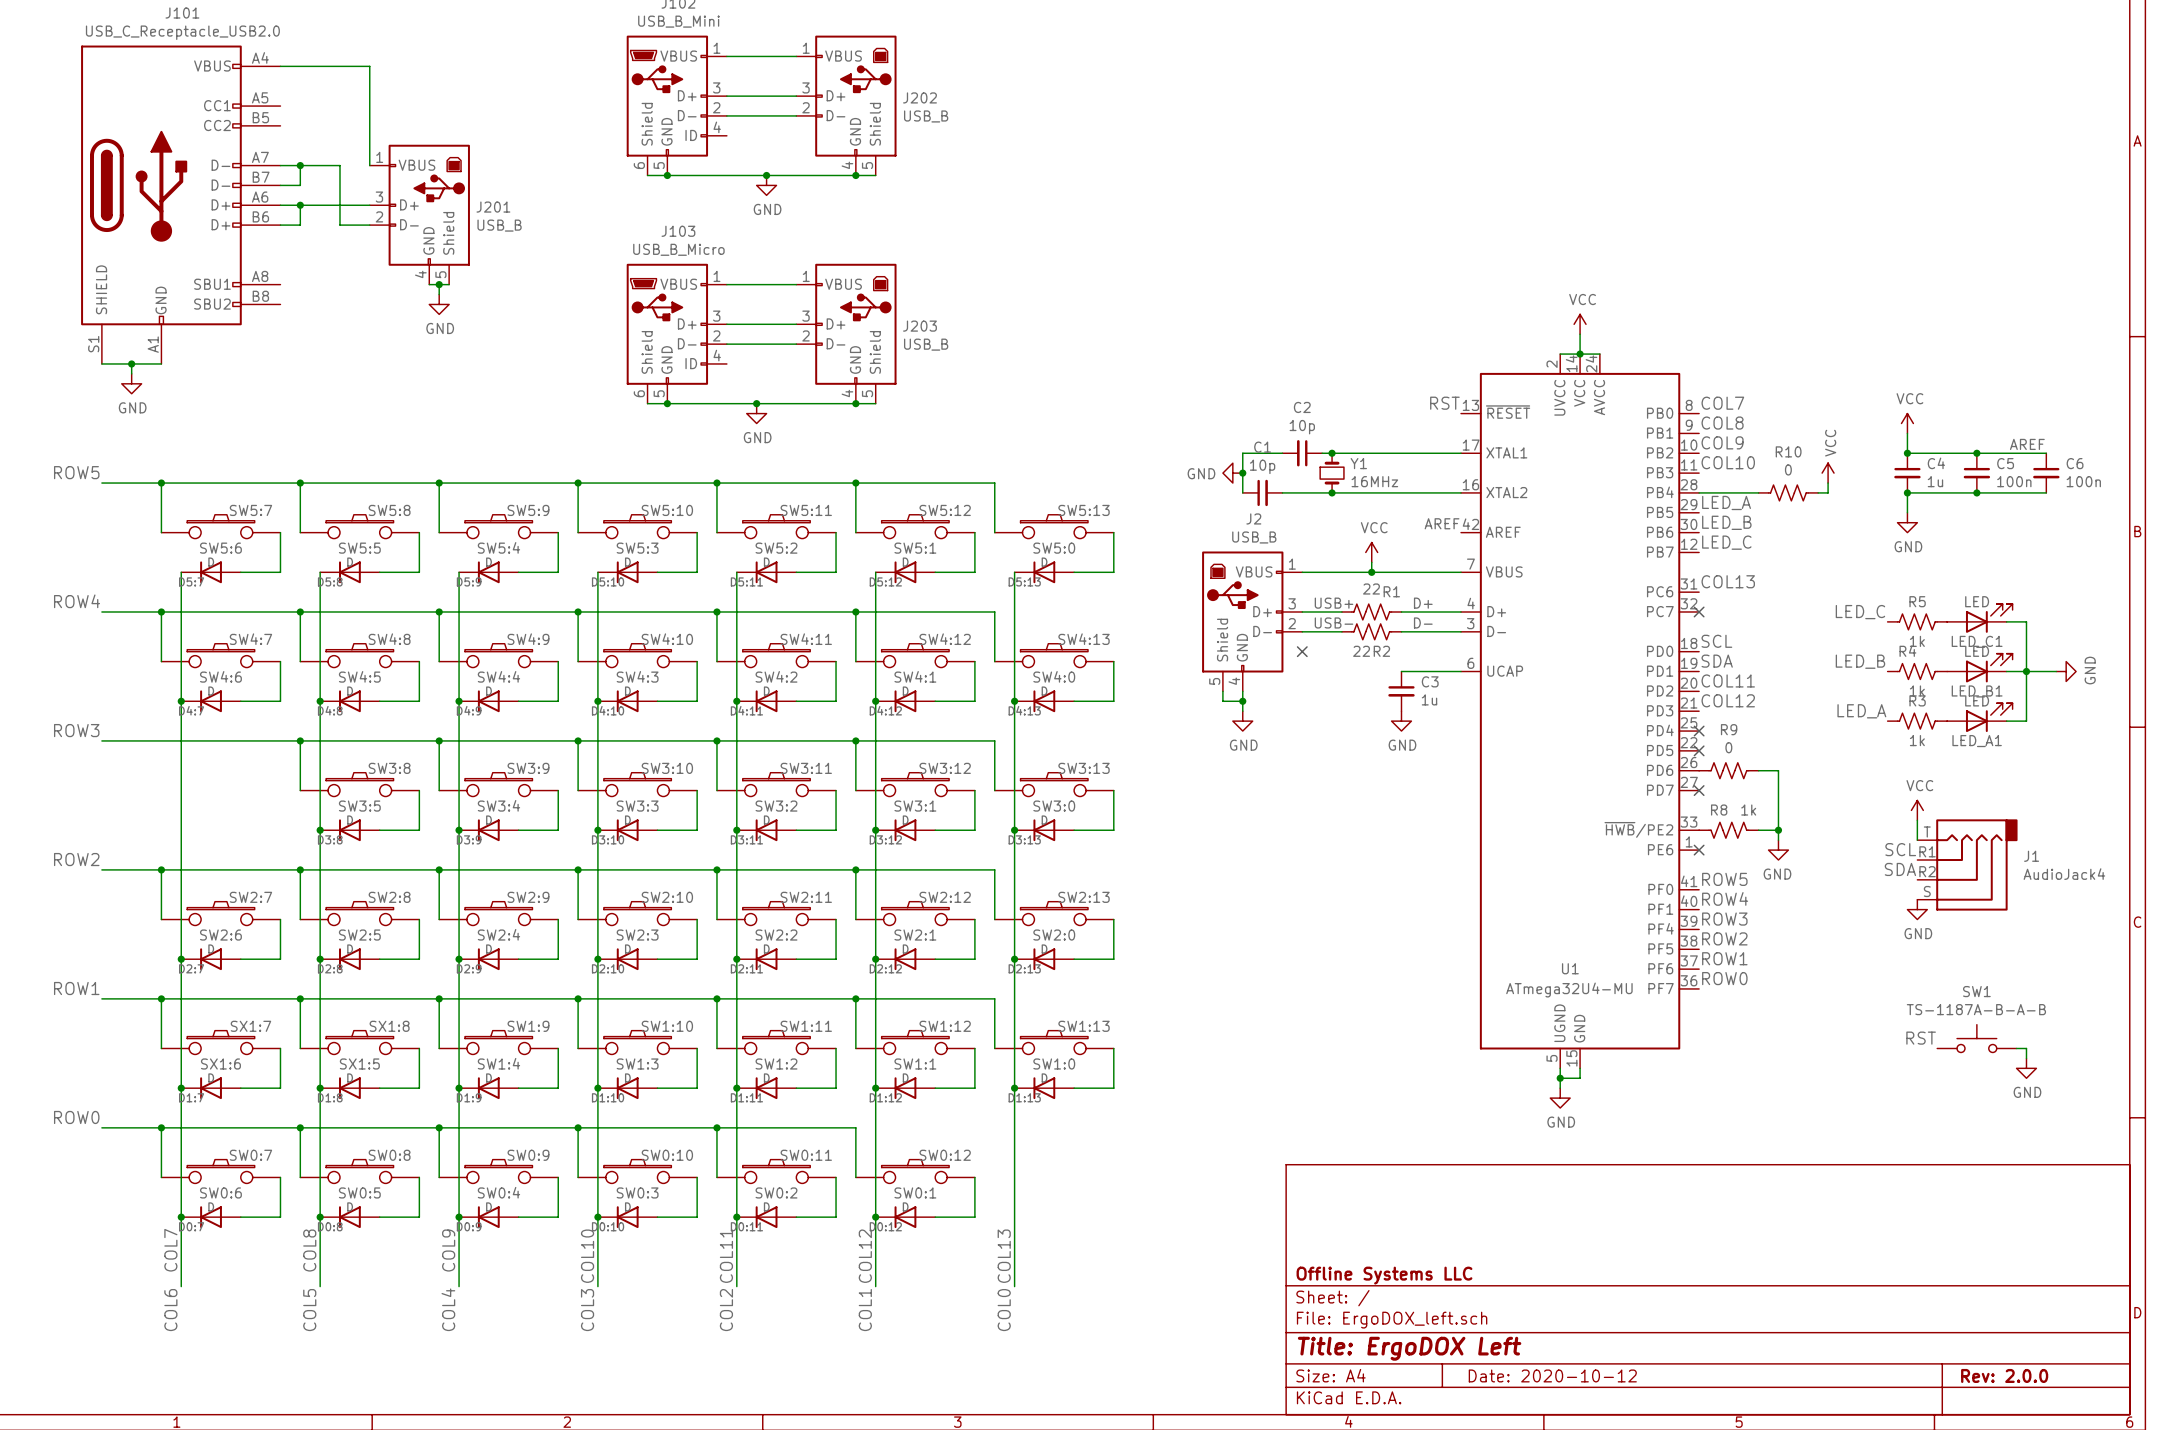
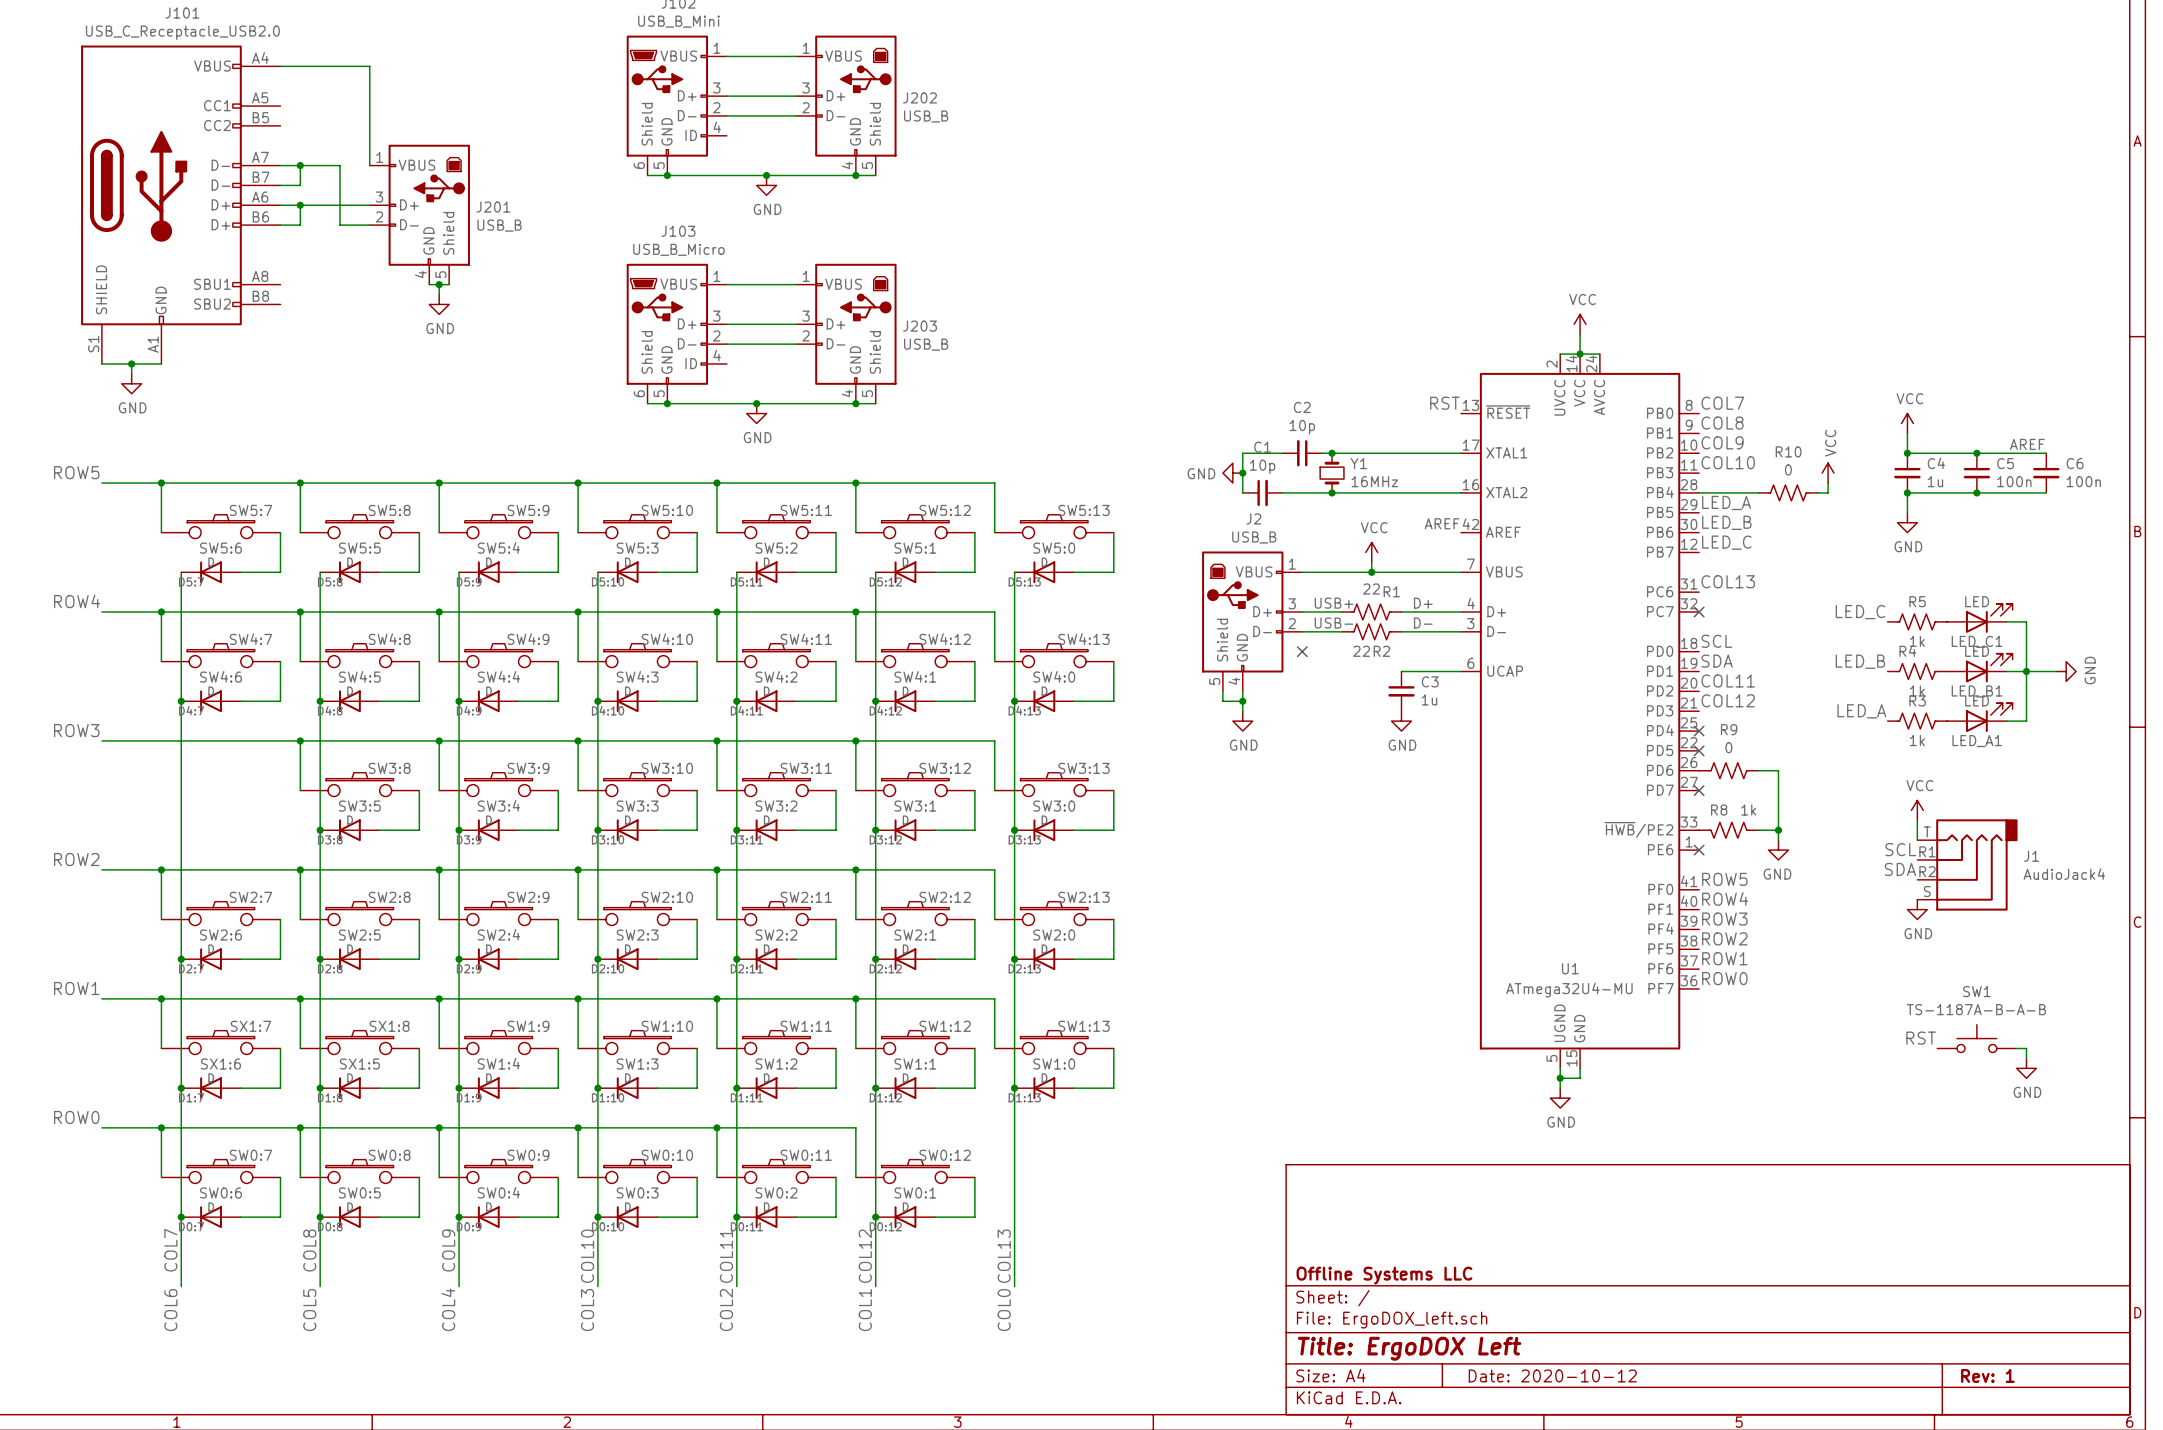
title block: Rev: 2.0.0 (2004, 1375) -> Rev: 1 (1987, 1375)

